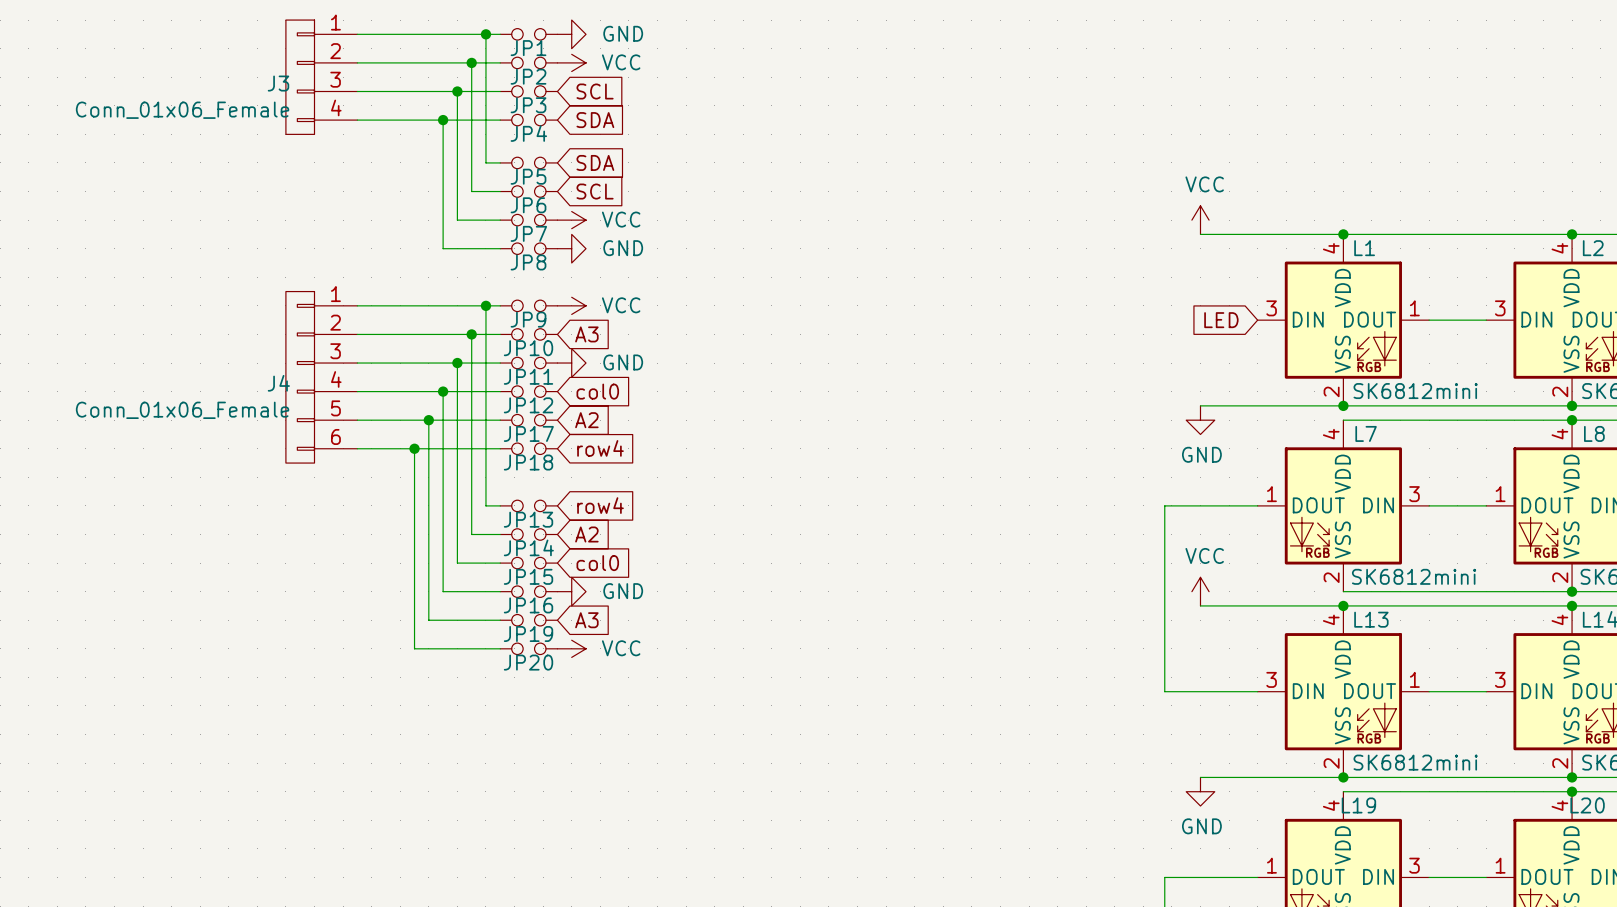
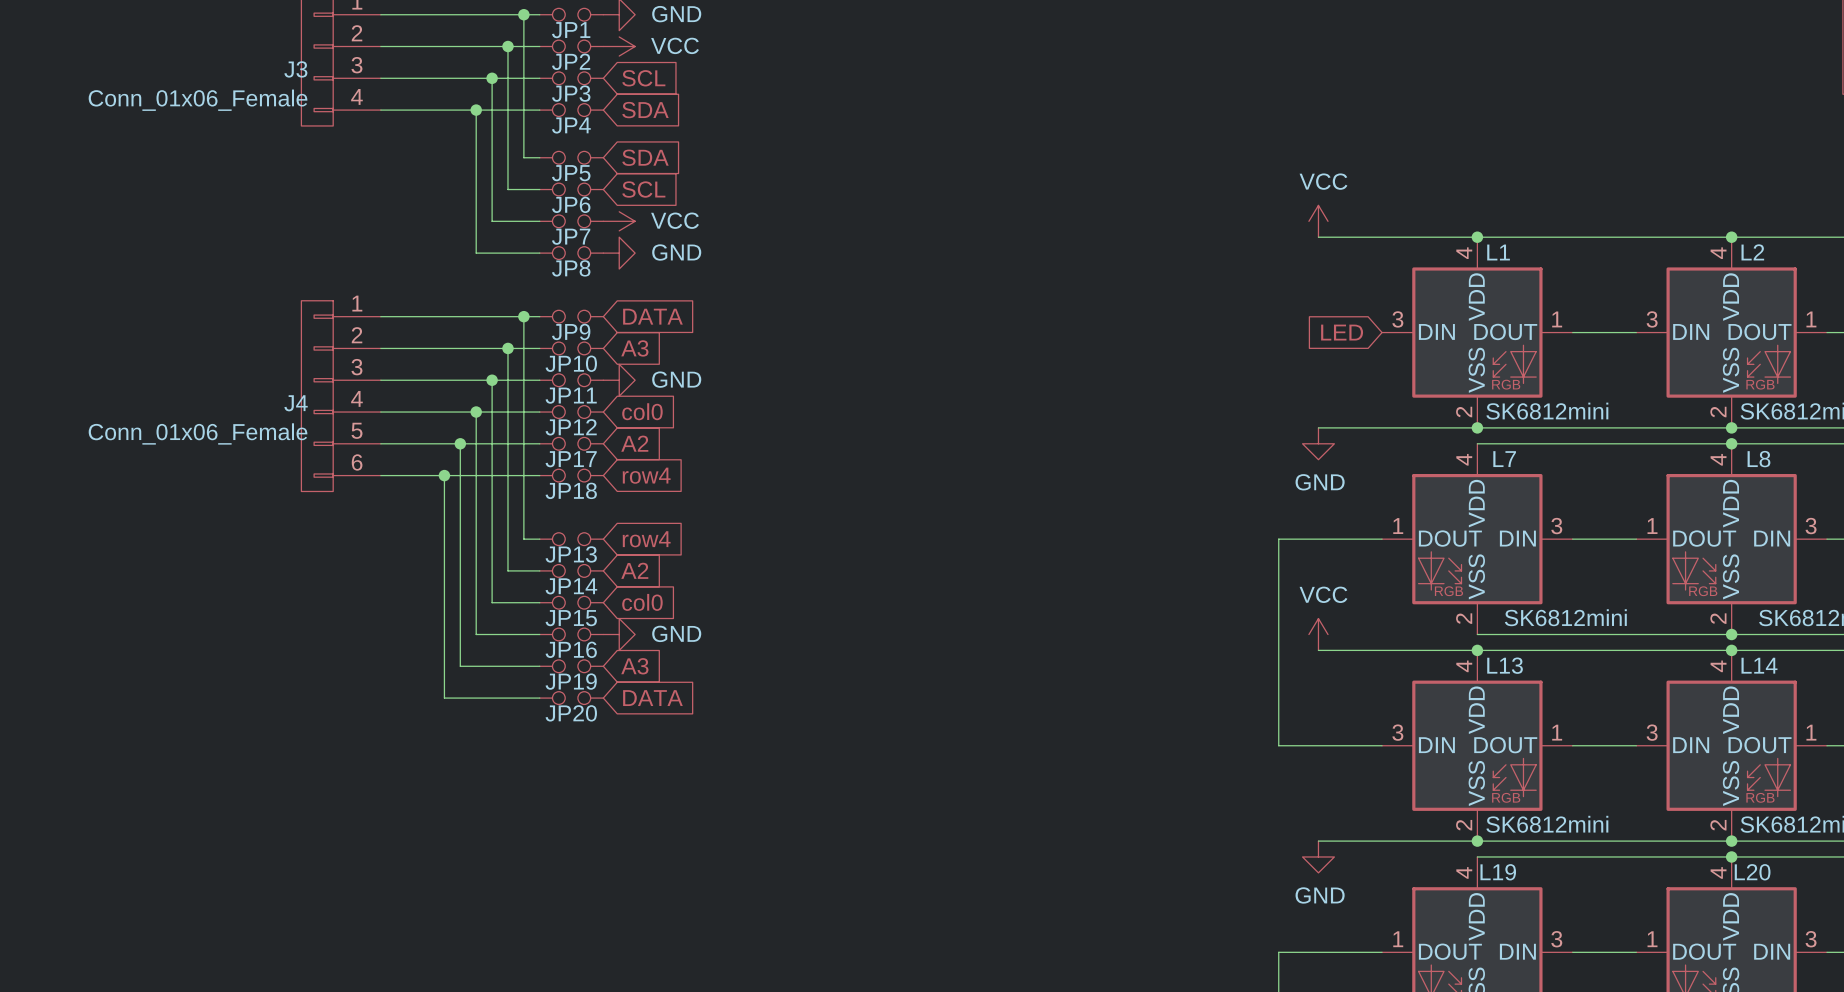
power symbol: VCC (571, 305) -> none
global label: none -> DATA (652, 316)
power symbol: VCC (571, 648) -> none
global label: none -> DATA (652, 698)

